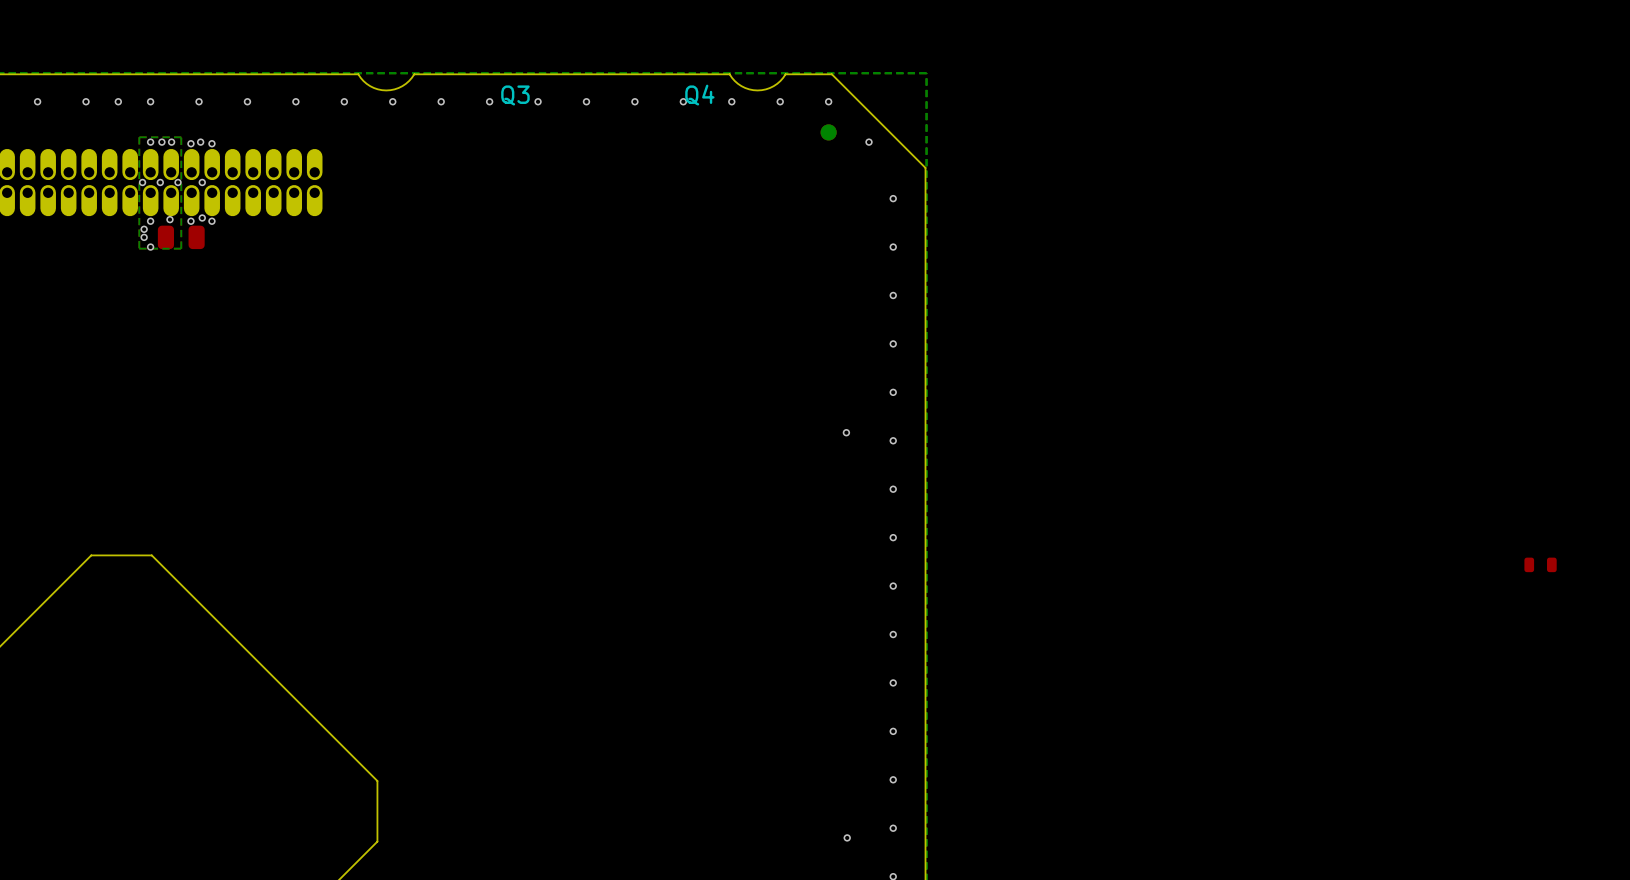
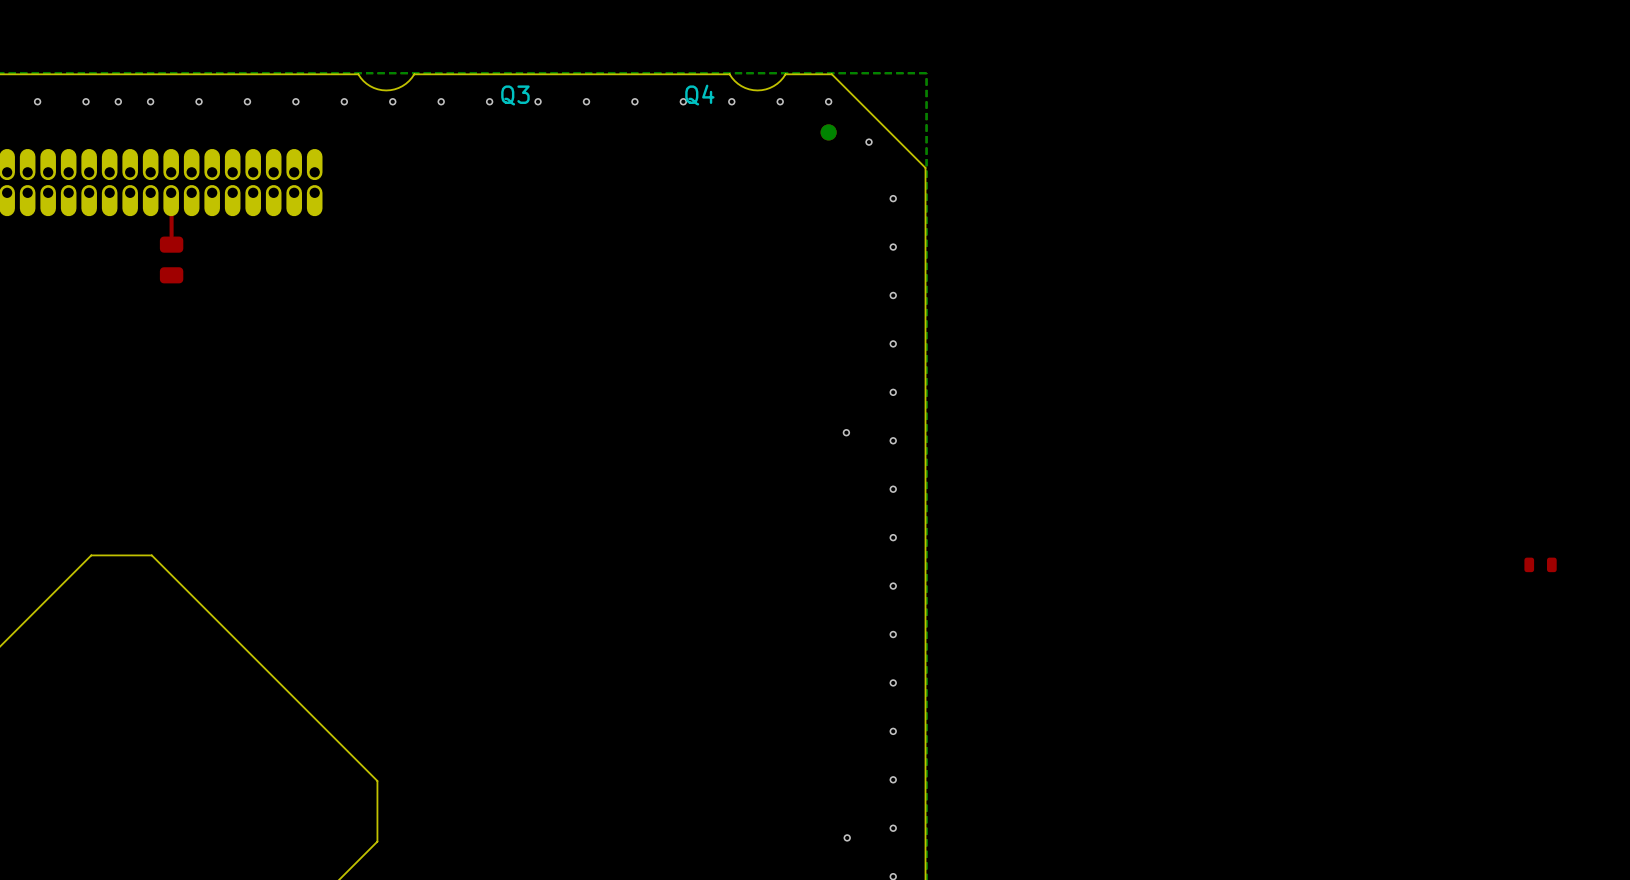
bottom zone outline: (181, 137) (139, 137) (139, 248) (181, 248) (181, 137) -> none
via: (150, 142) -> none
via: (161, 142) -> none
via: (171, 142) -> none
via: (200, 142) -> none
via: (190, 143) -> none
via: (211, 143) -> none
via: (142, 182) -> none
via: (160, 182) -> none
via: (178, 182) -> none
via: (202, 182) -> none
top track: none -> (171, 193) (171, 236)
via: (202, 217) -> none
via: (169, 219) -> none
via: (150, 221) -> none
via: (190, 221) -> none
via: (211, 221) -> none
via: (144, 229) -> none
via: (144, 237) -> none
part rotation: 0° (181, 237) -> 90° clockwise (171, 259)
via: (150, 247) -> none

